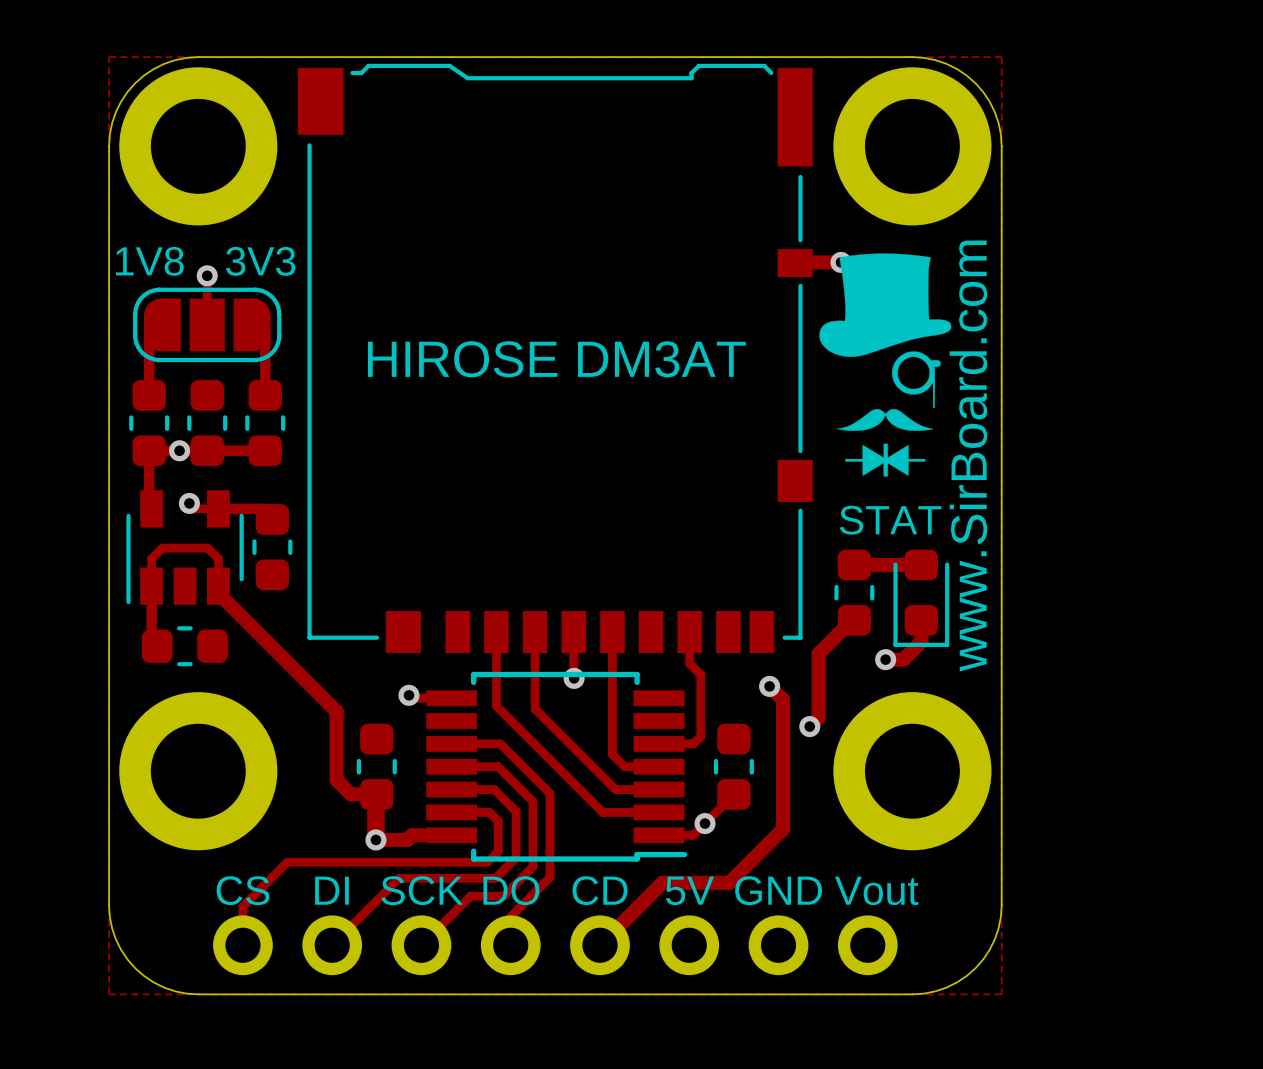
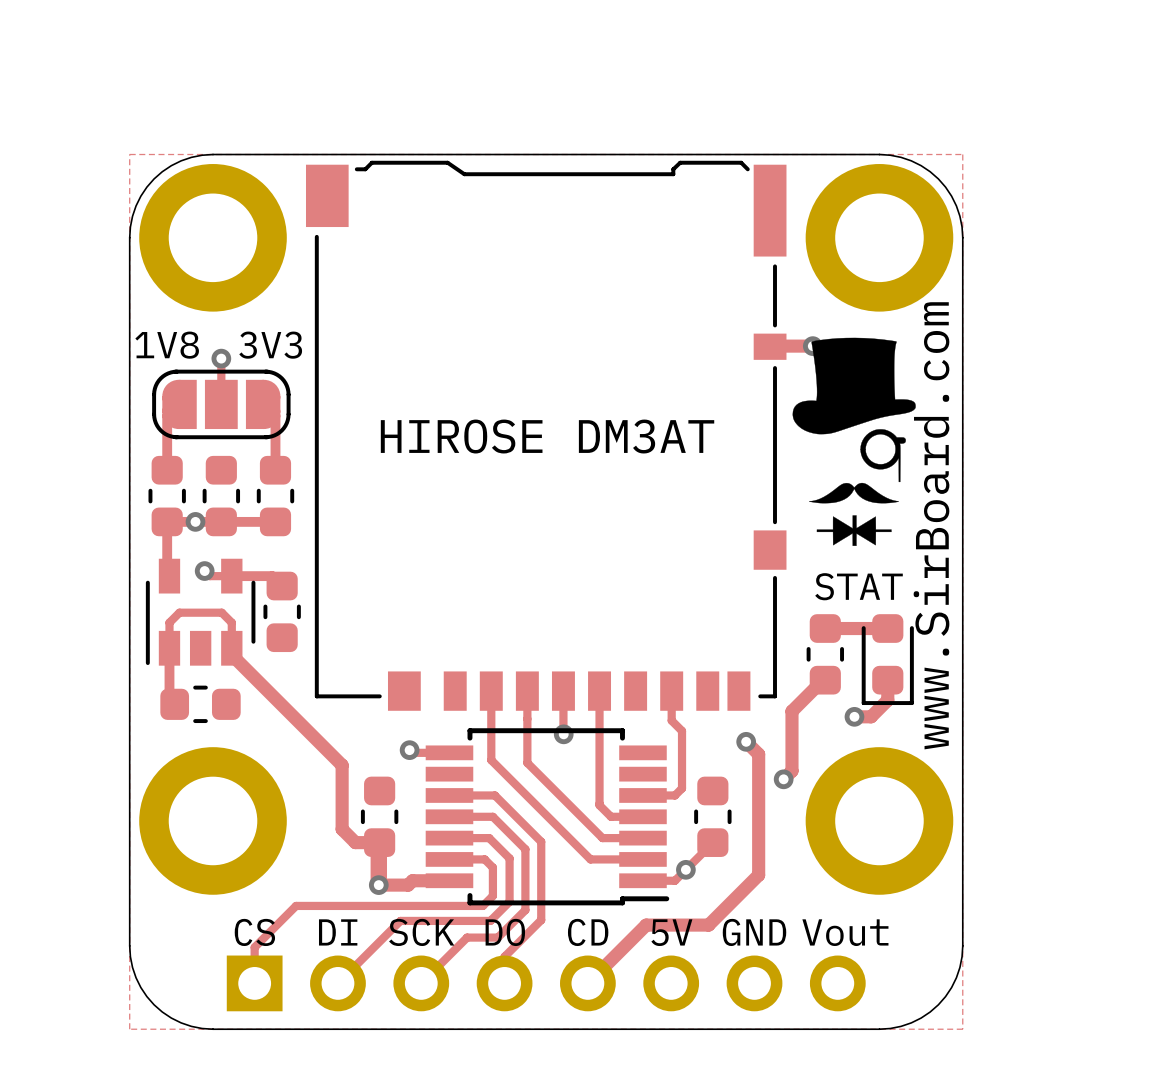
part footprint: [213, 915, 898, 976] -> [226, 955, 866, 1012]

